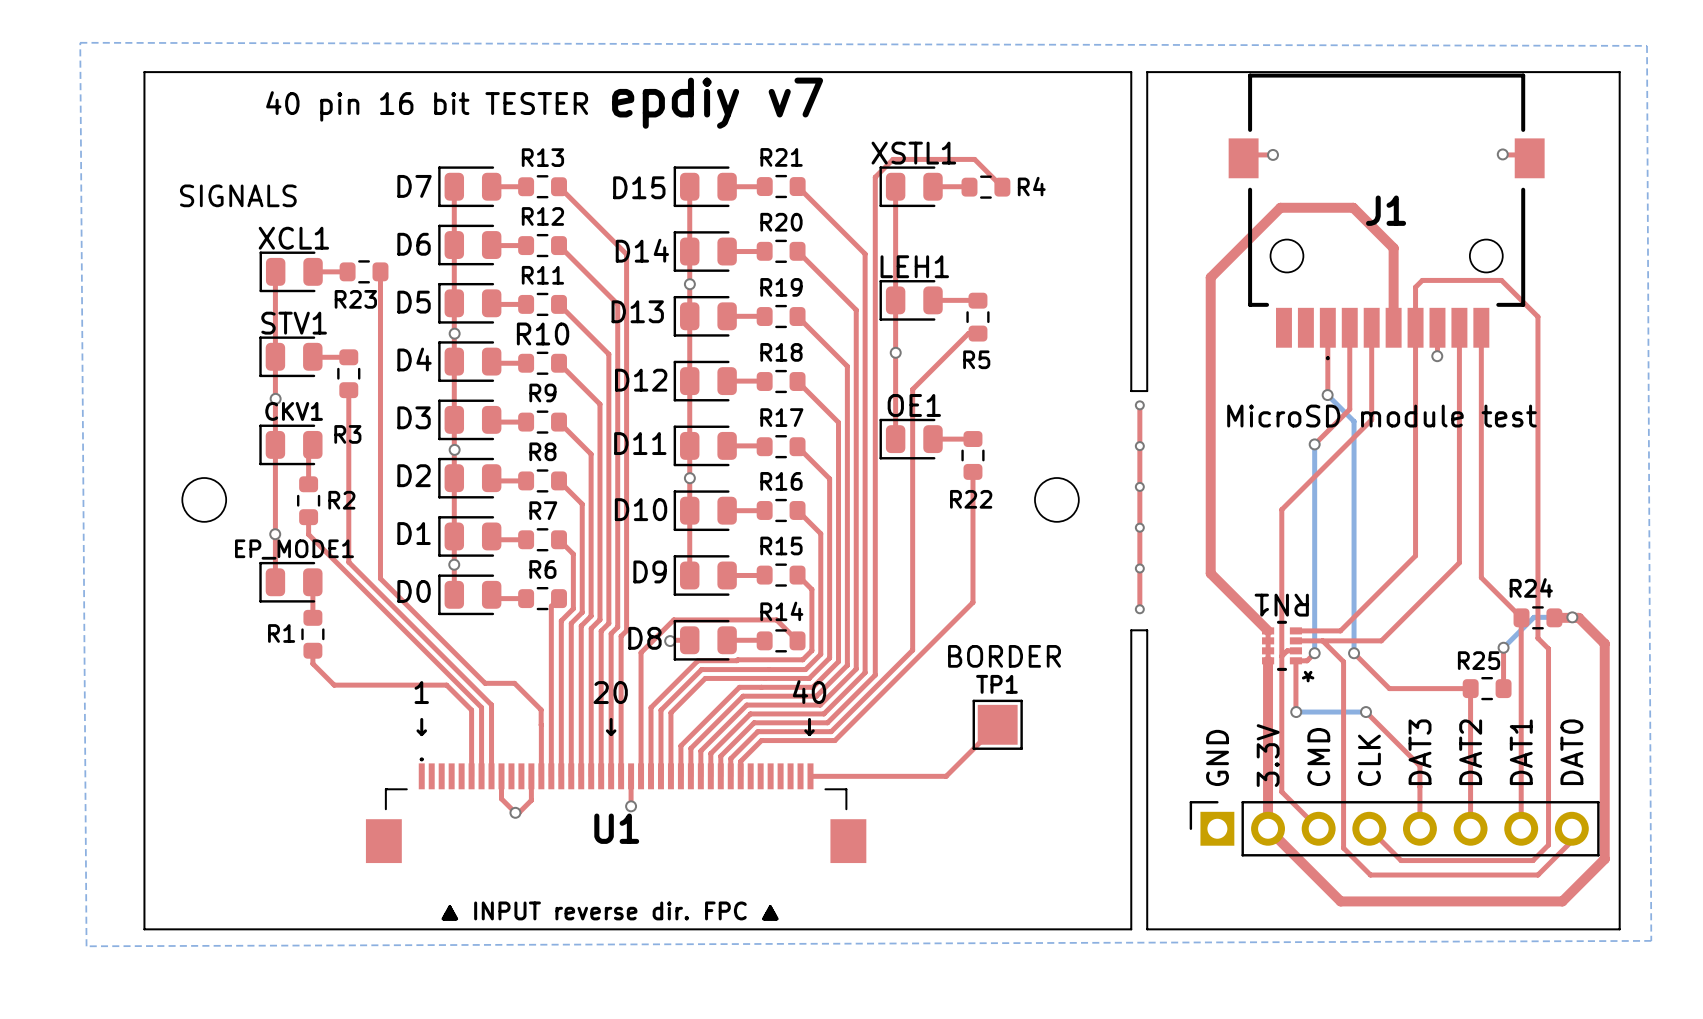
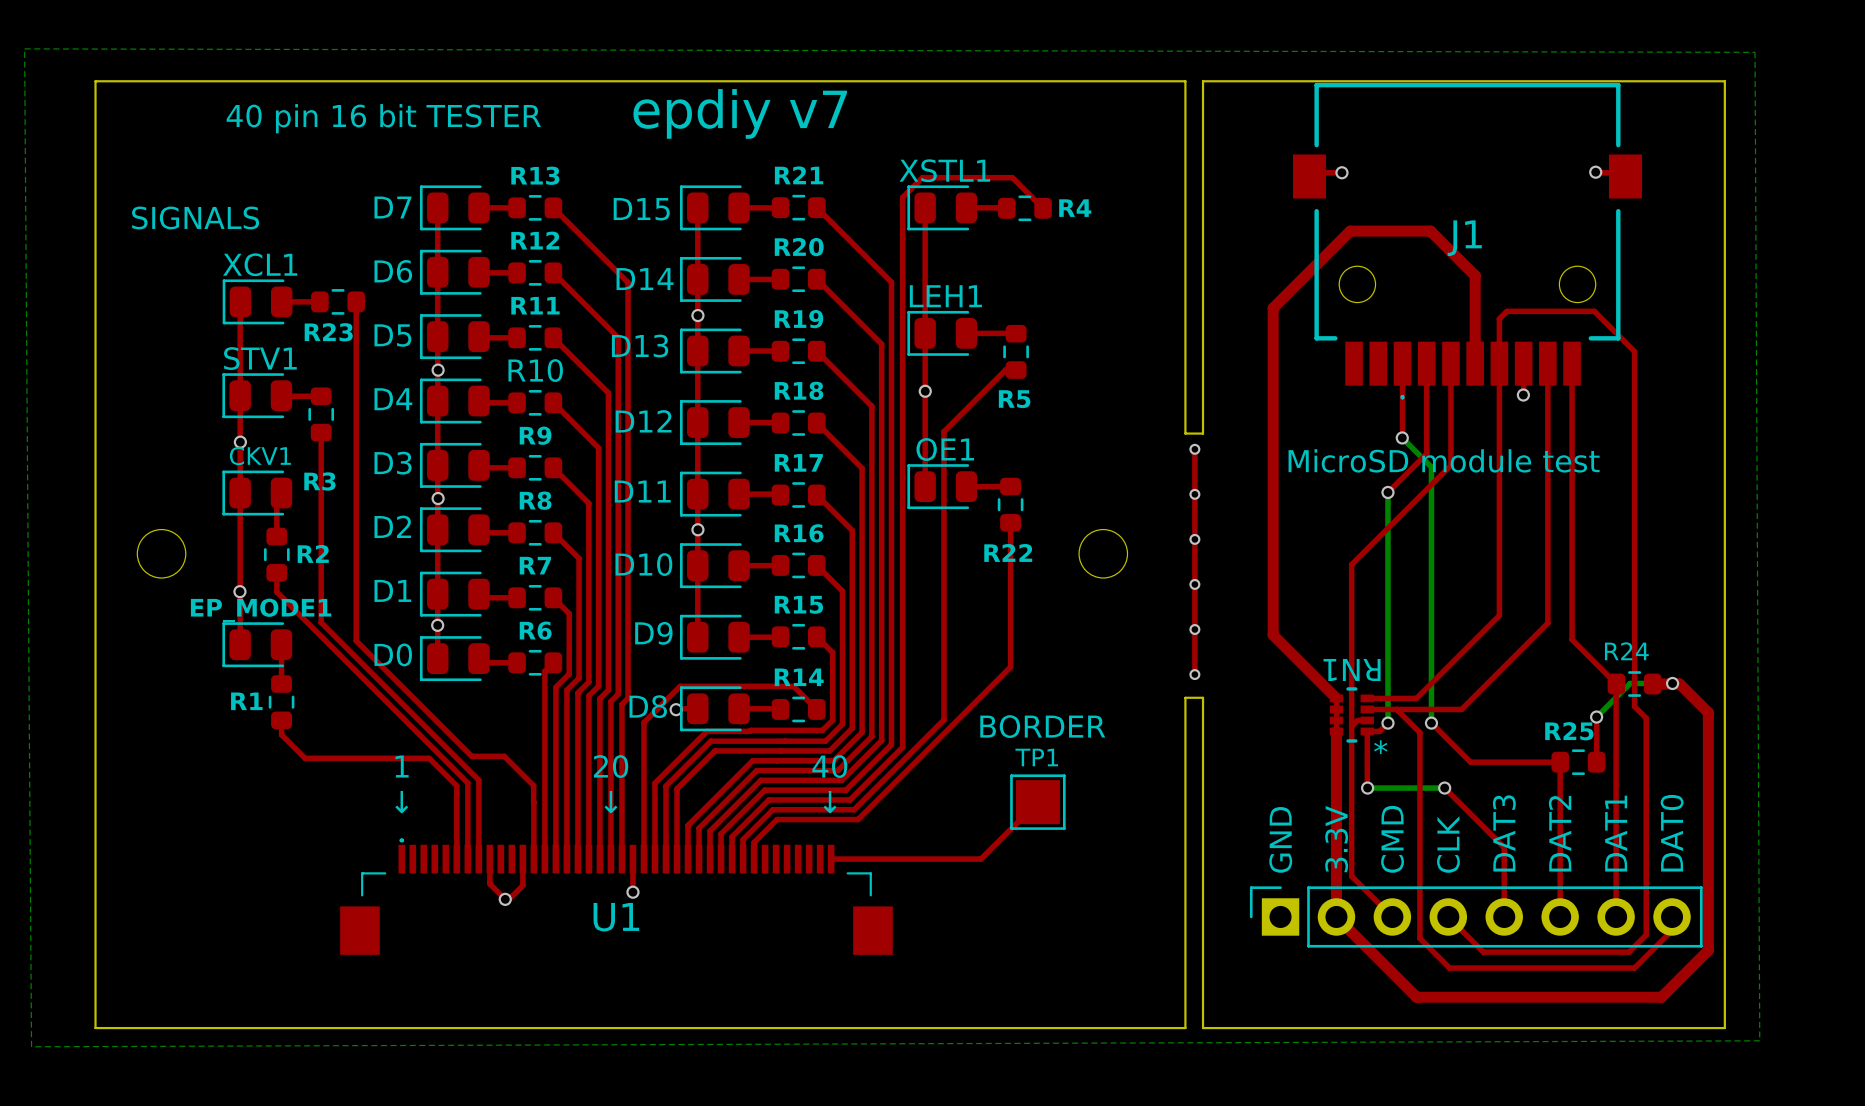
text: ▲ INPUT reverse dir. FPC ▲ (610, 910) -> none

